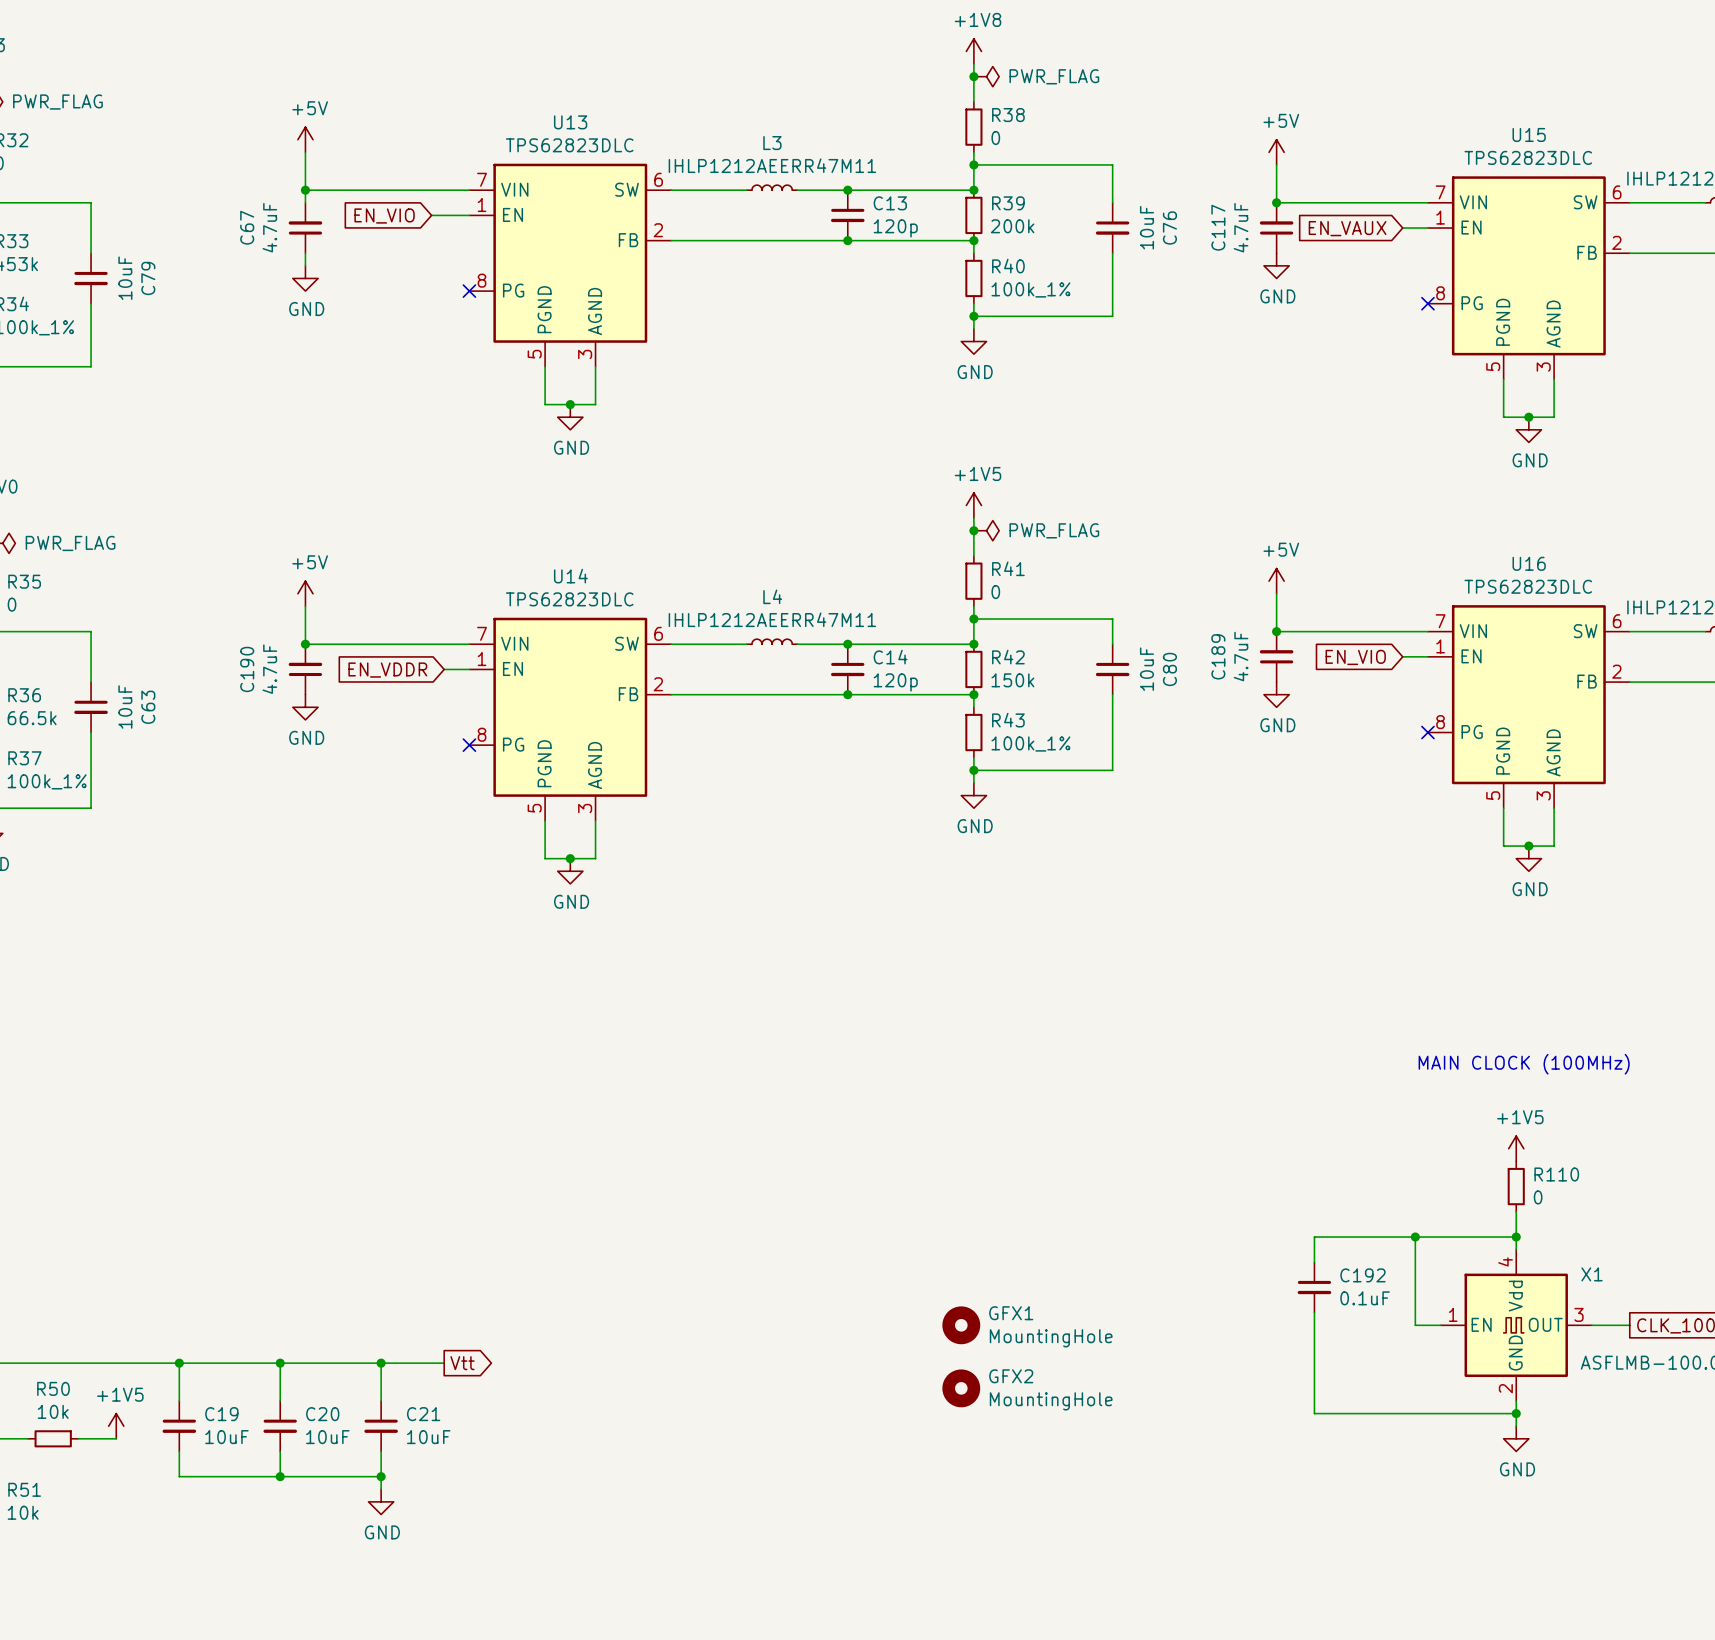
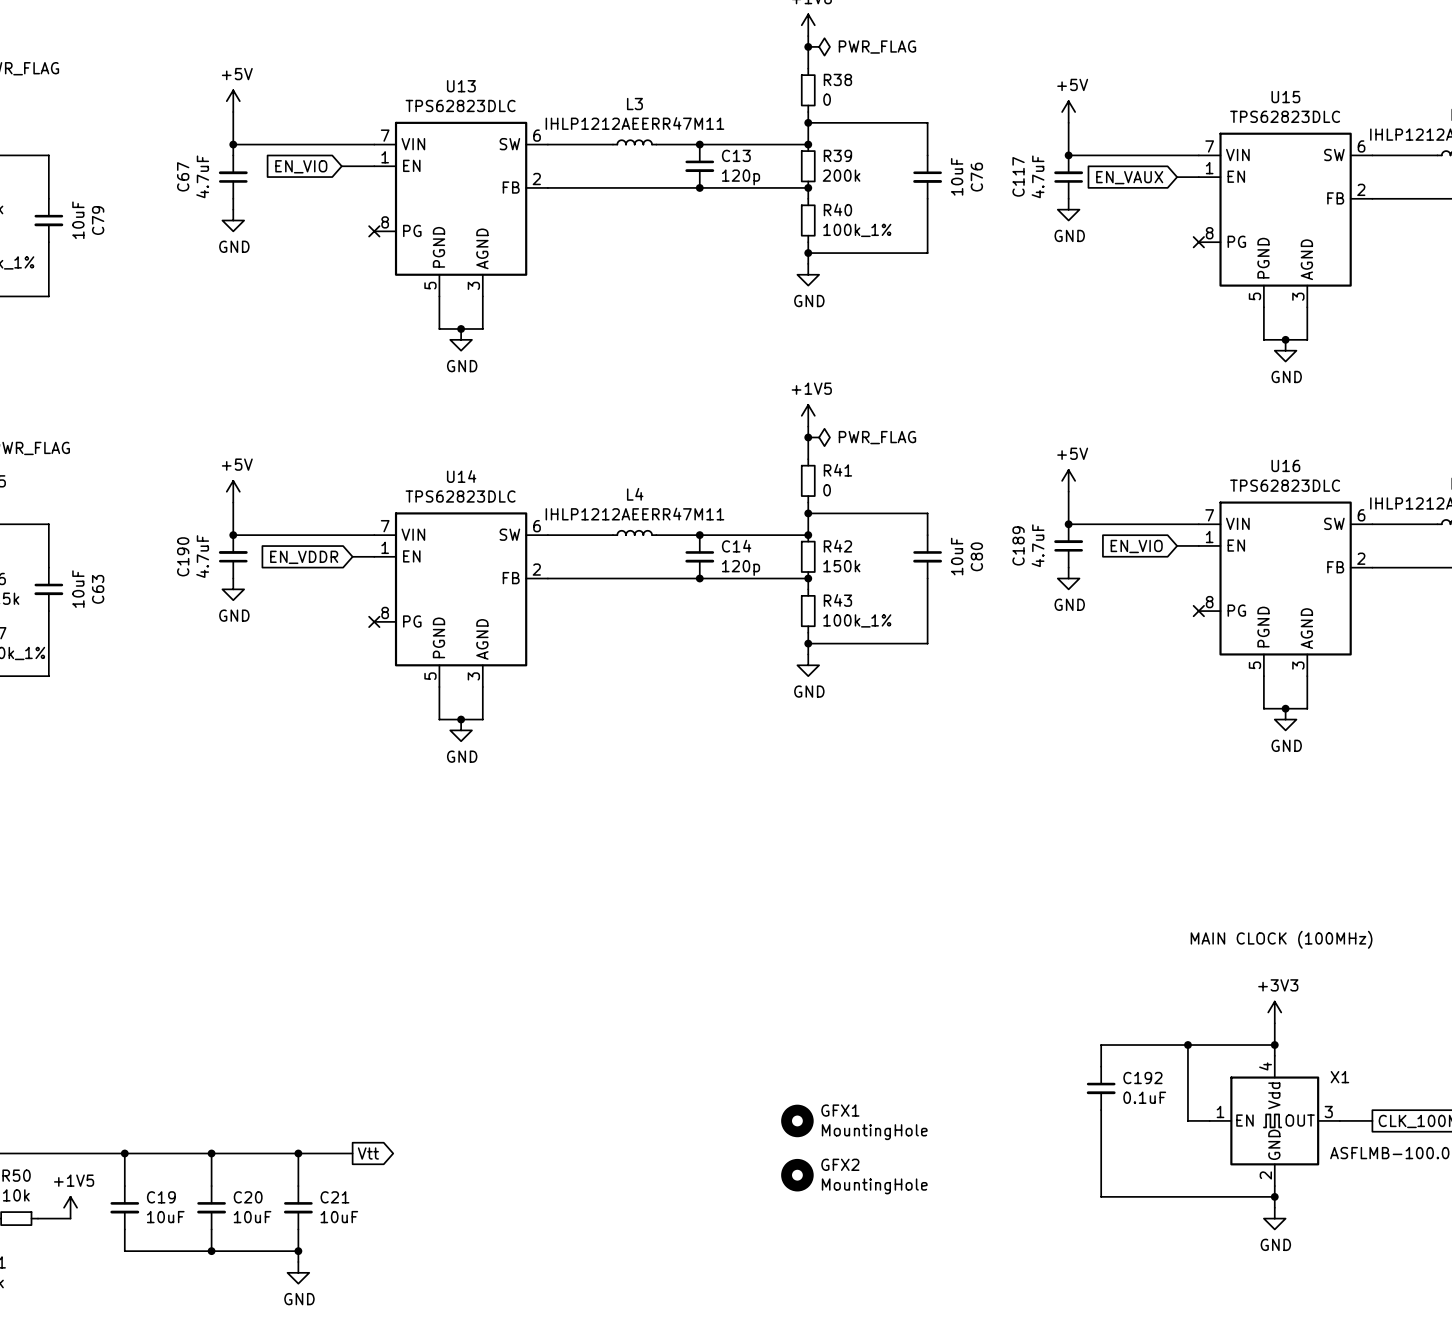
text position: MAIN CLOCK (100MHz) (1524, 1064) -> MAIN CLOCK (100MHz) (1281, 939)
power symbol: +1V5 (1516, 1148) -> none
R110: 0 (1516, 1186) -> none
power symbol: none -> +3V3 (1274, 1012)

